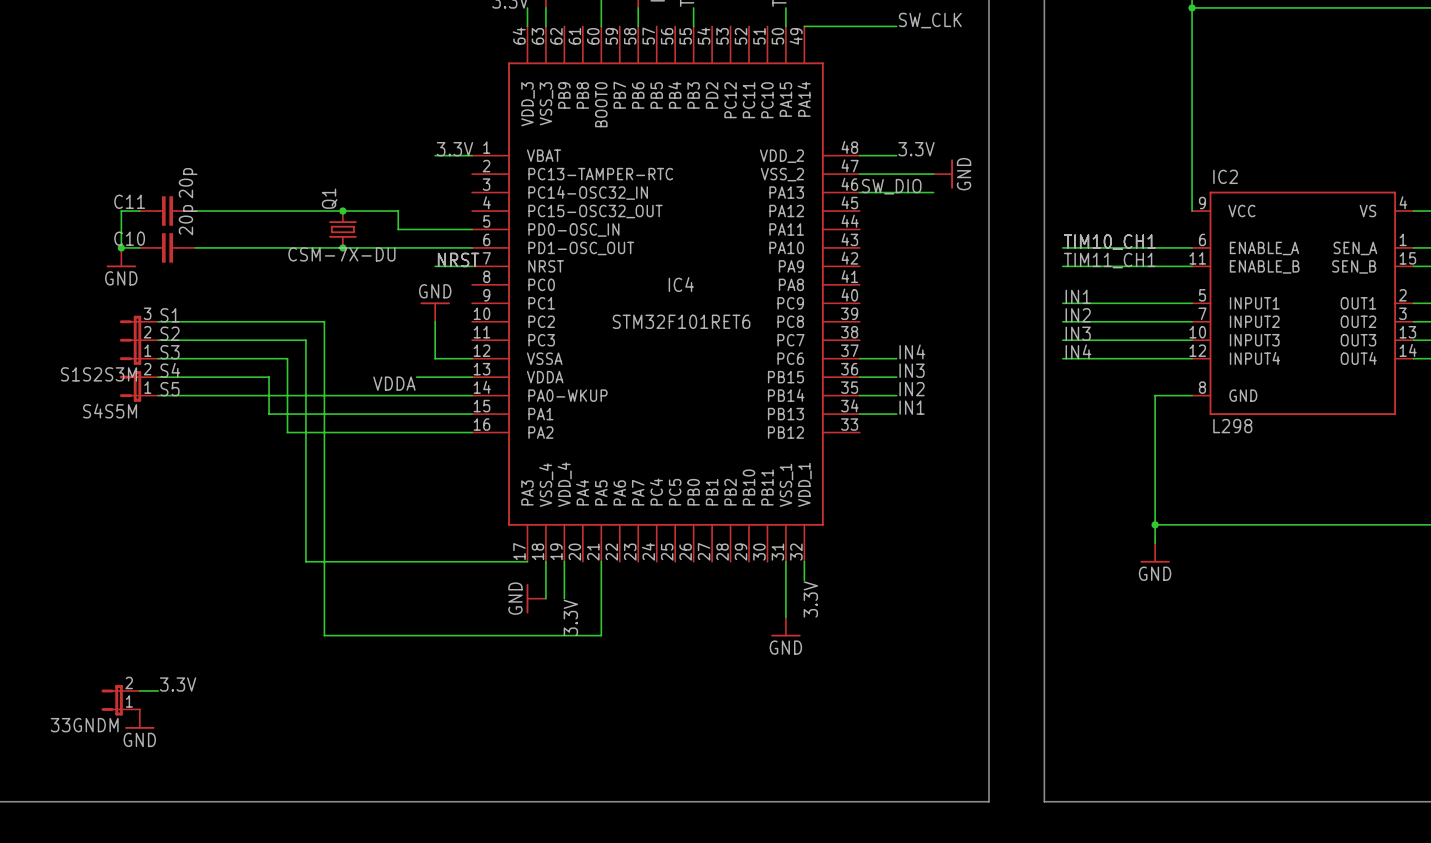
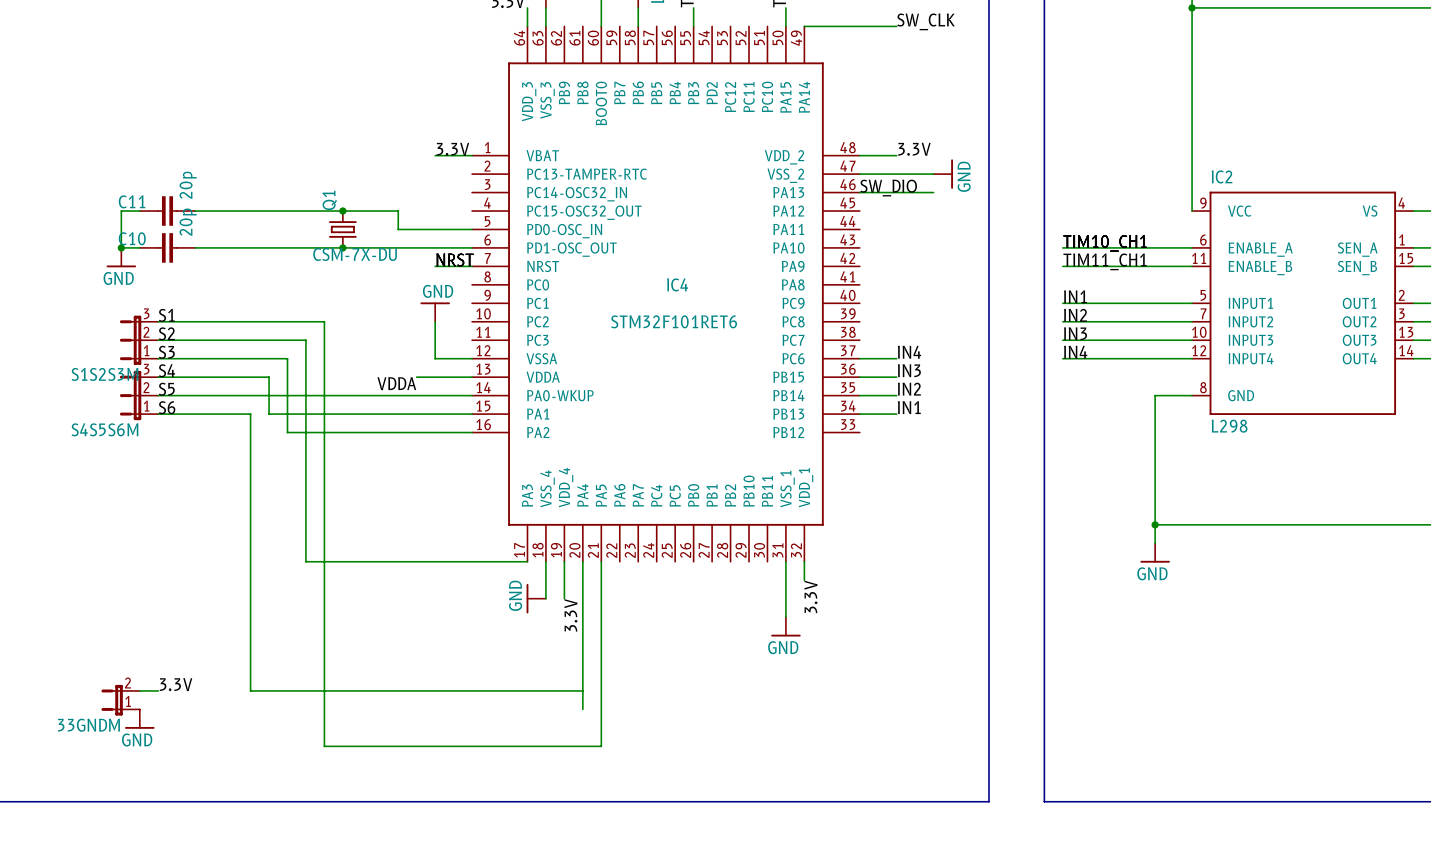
S4S5M: (139, 386) -> none
S4S5S6M: none -> (139, 395)
label: none -> S6 (167, 407)
wire: none -> (158, 414) (250, 414) (250, 690) (582, 690)
wire: none -> (582, 561) (582, 709)
wire: (324, 635) (601, 635) -> (324, 635) (324, 746) (601, 746) (601, 635)

